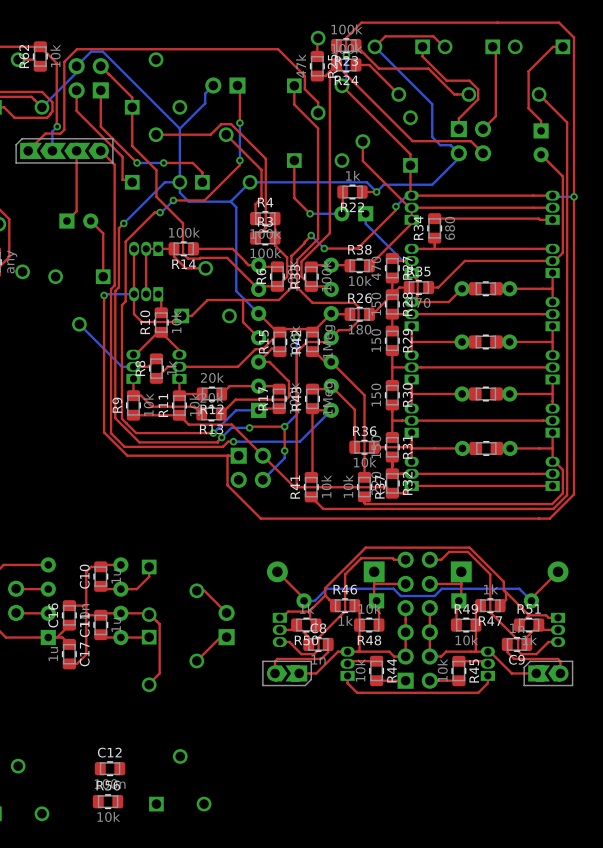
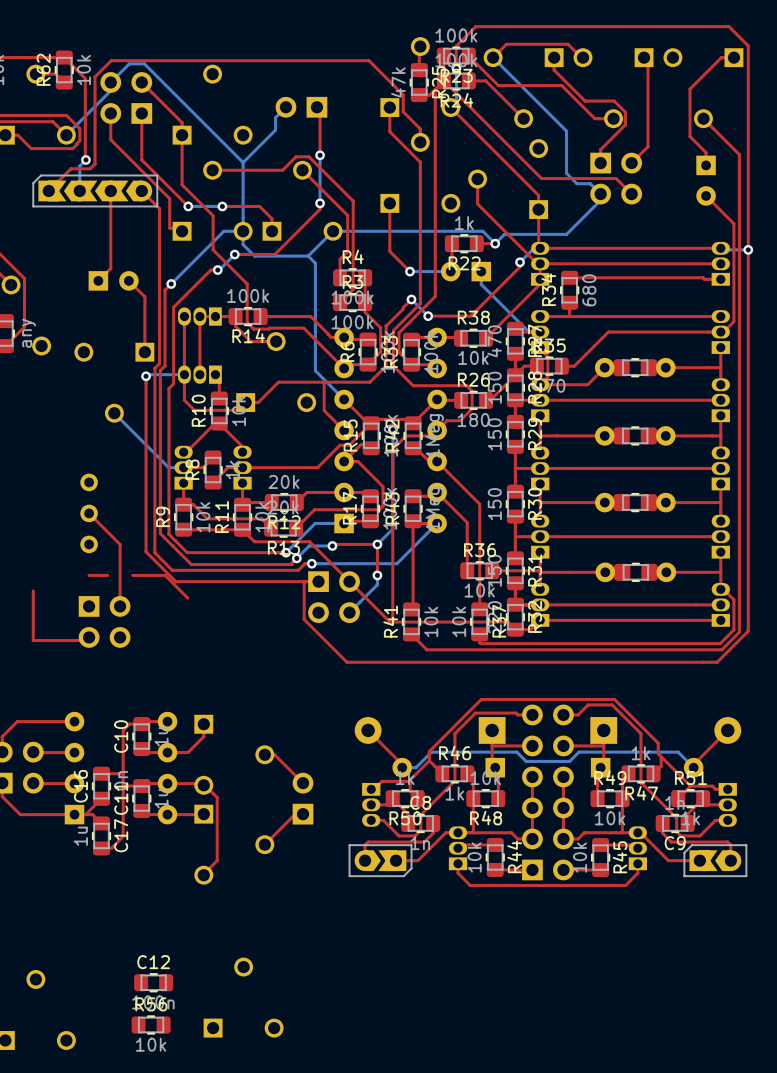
top track: none -> (89, 513) (120, 544) (120, 606)
part: none -> (89, 513)
top track: none -> (89, 575) (107, 575)
top track: none -> (132, 575) (165, 575) (187, 598)
top track: none -> (33, 590) (33, 640) (95, 640)
part: none -> (104, 621)

